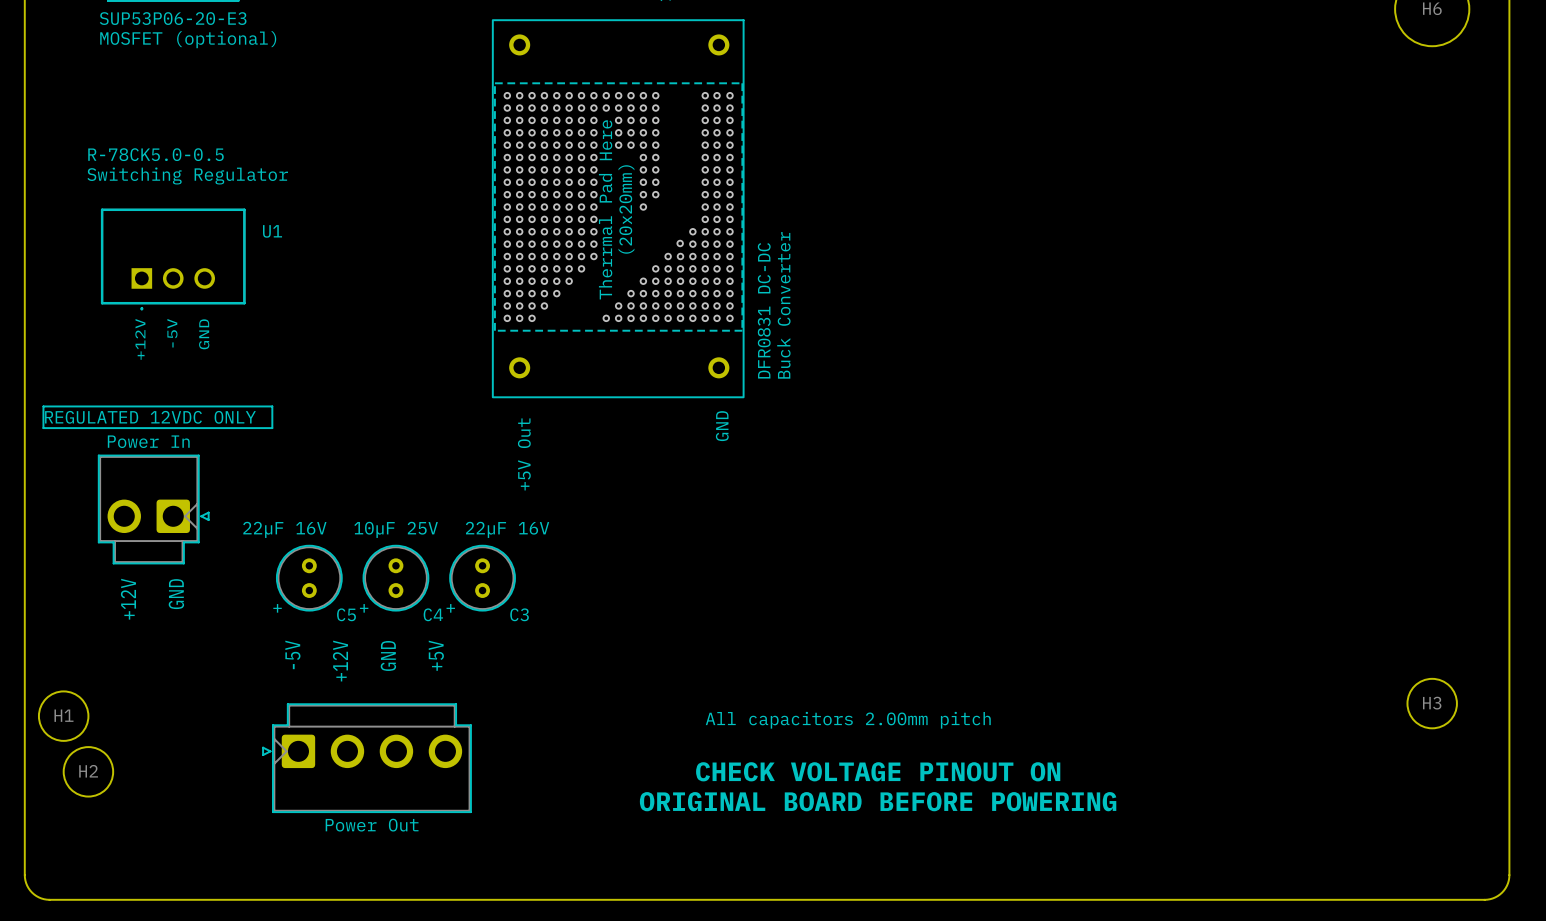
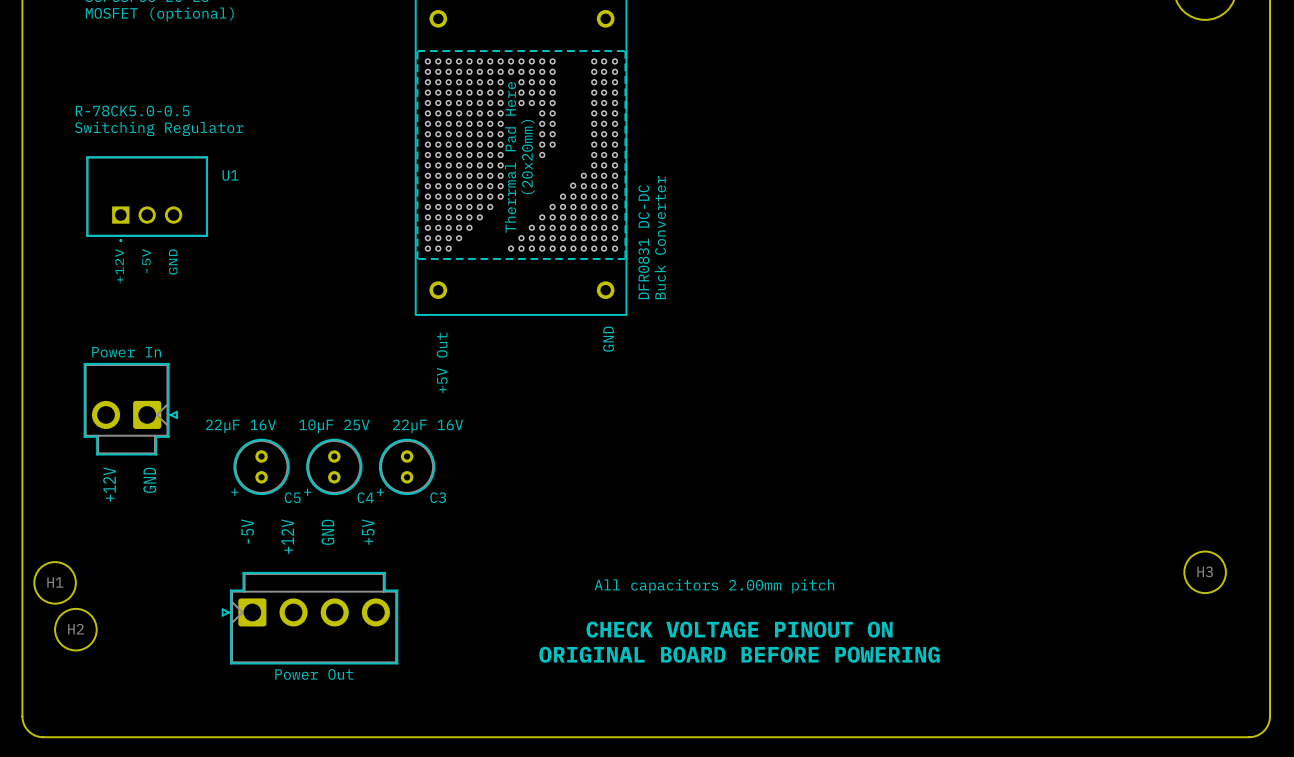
line: (43, 406) (272, 406) (272, 428) (43, 428) (43, 406) -> none
text: REGULATED 12VDC ONLY (150, 417) -> none

